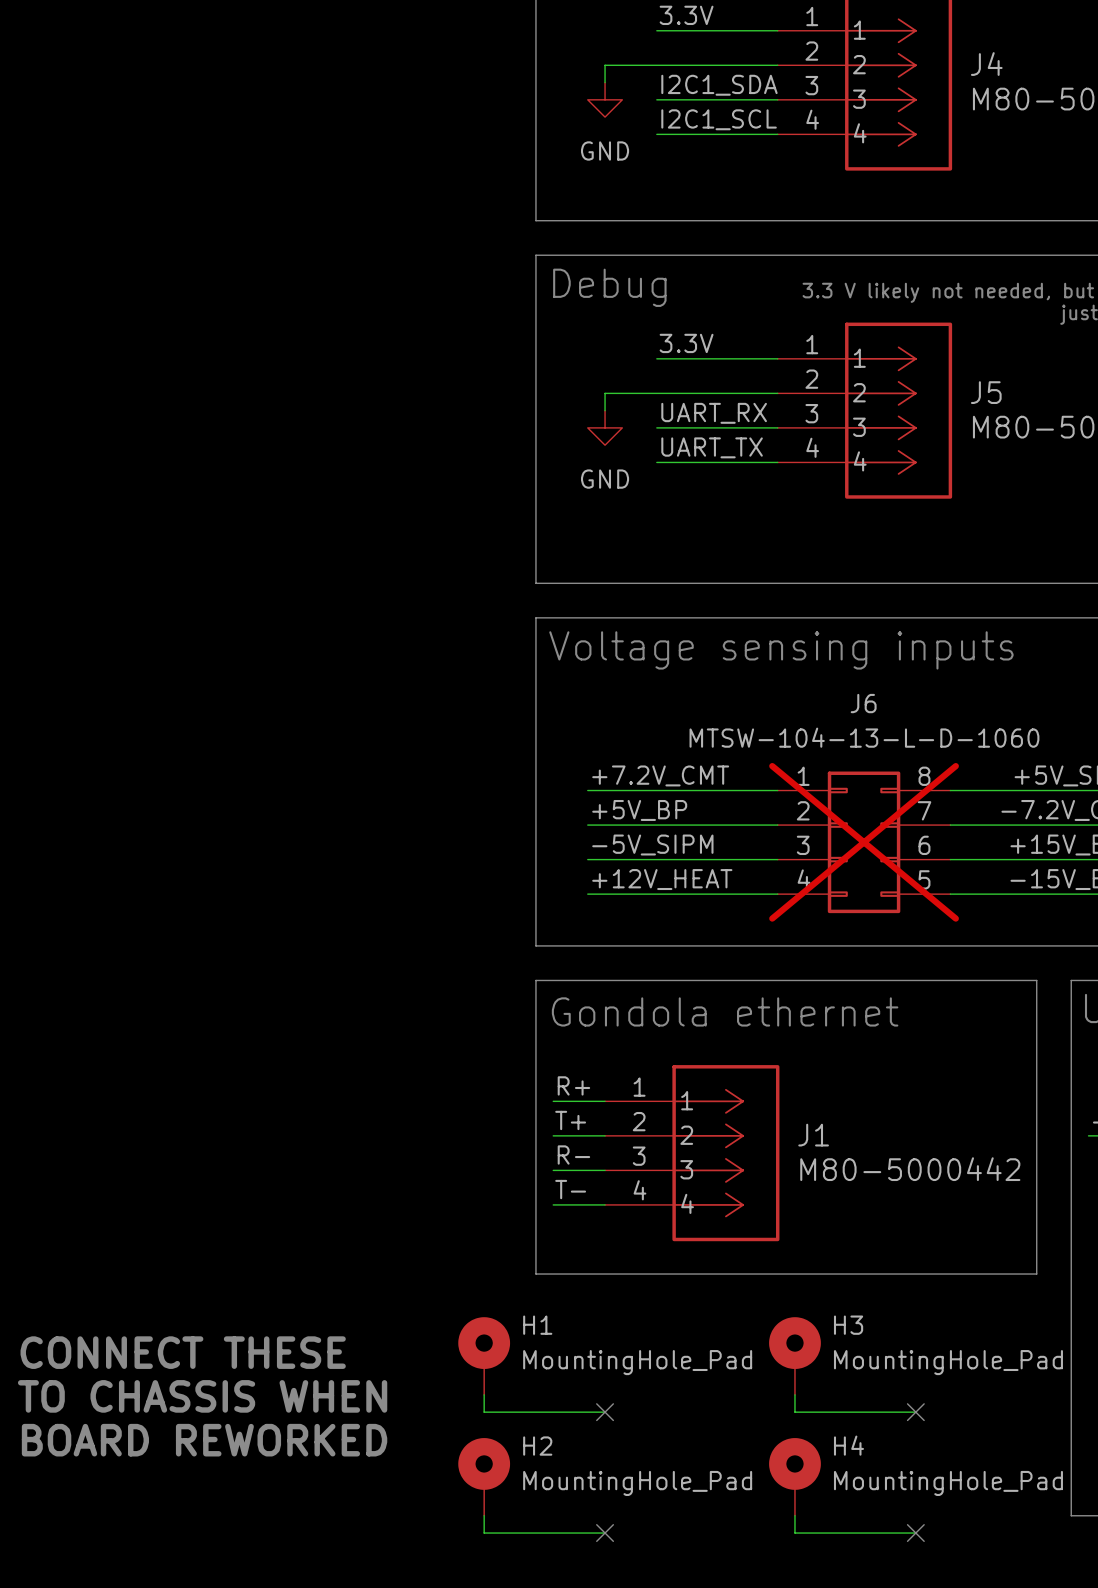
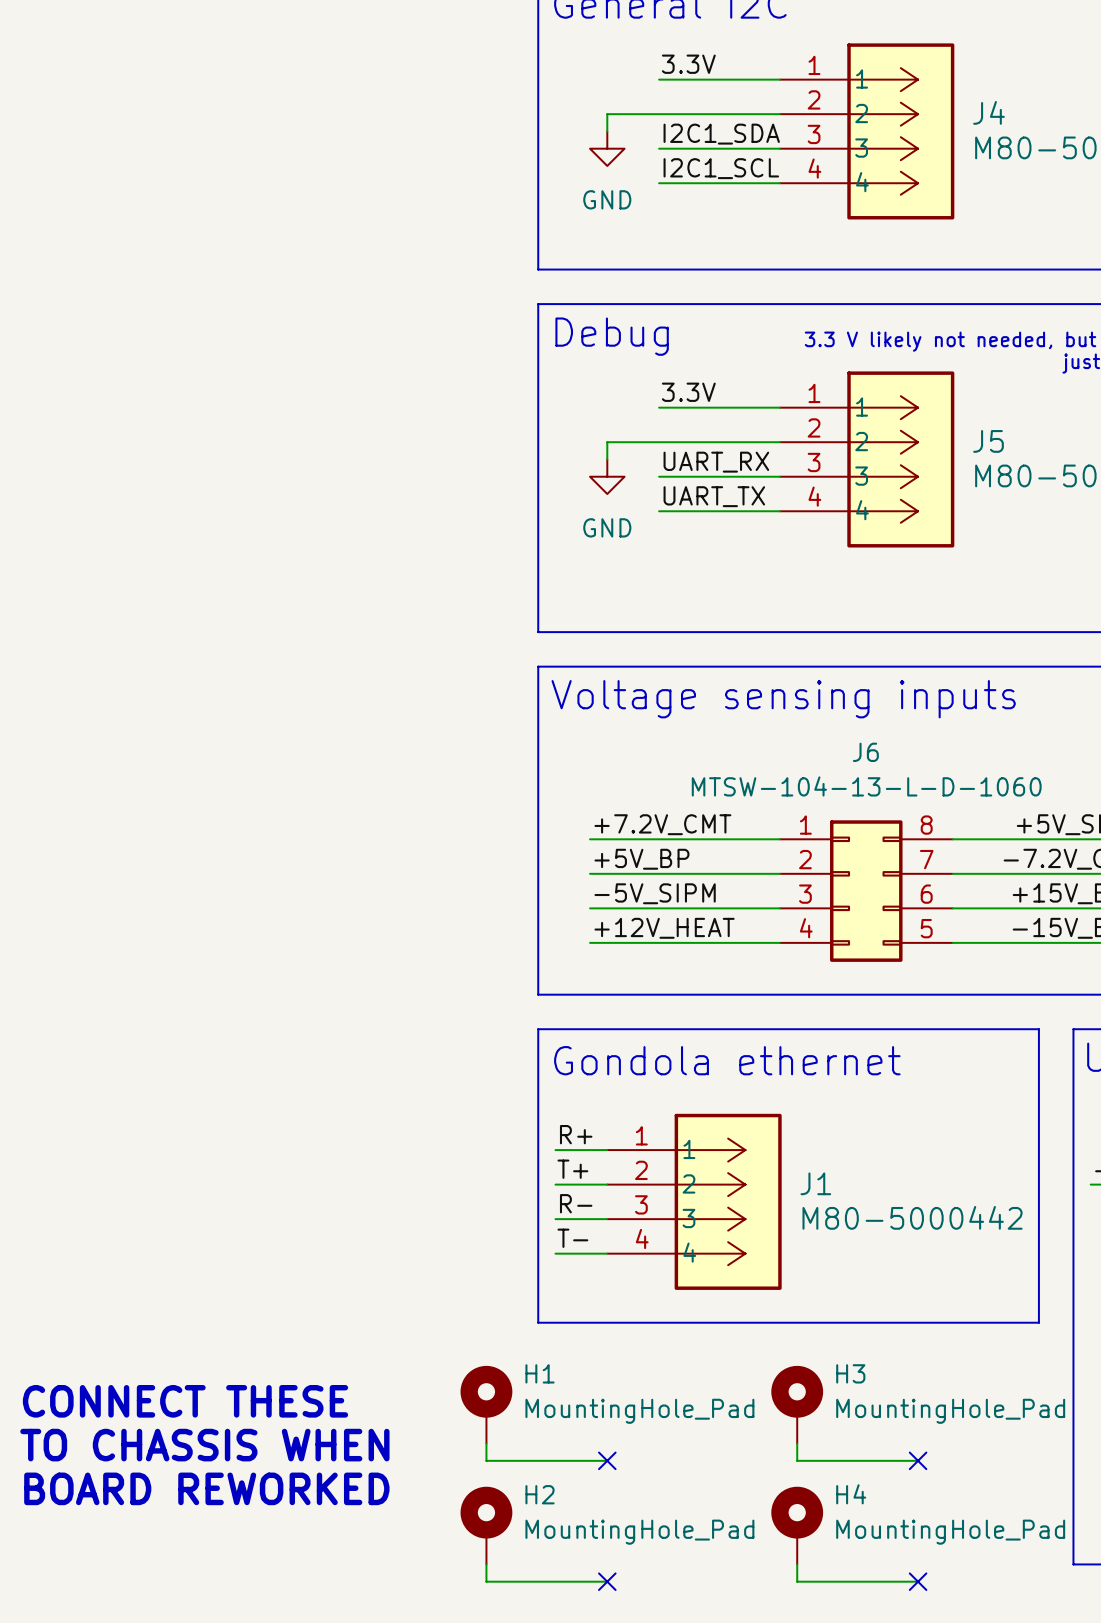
J6 do-not-place cross: (864, 842) -> none

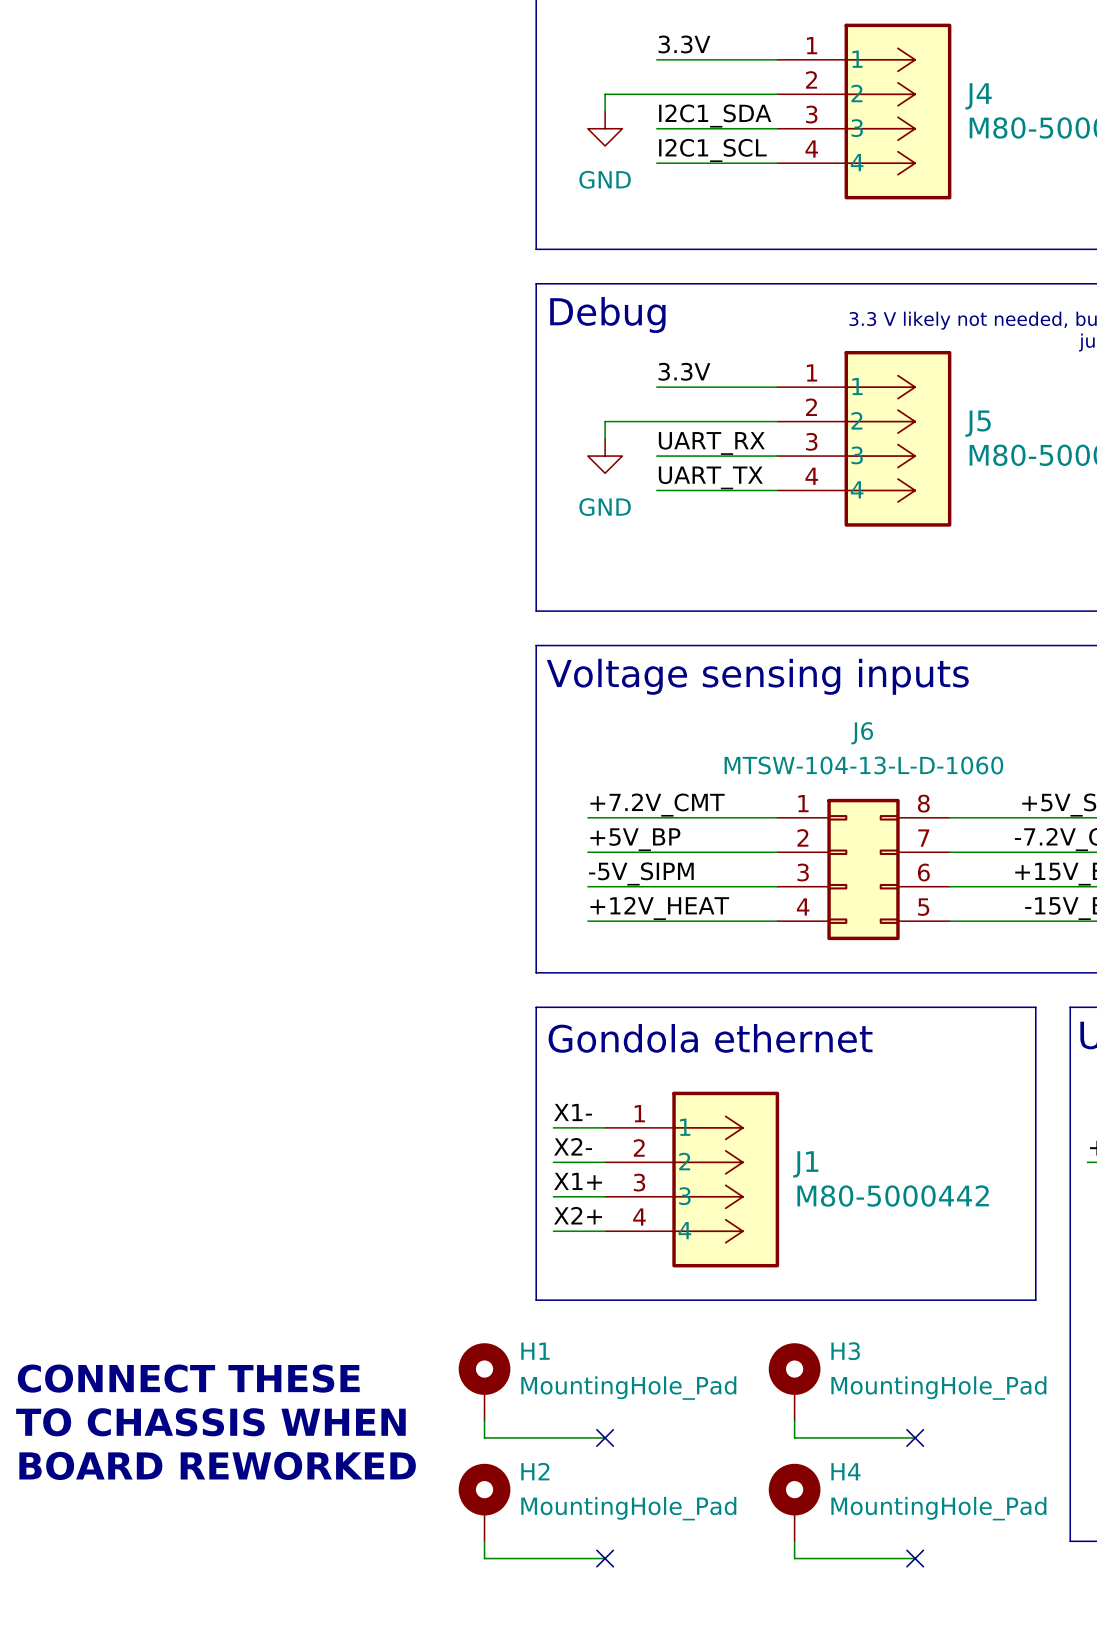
label: R+ (576, 1134) -> X1- (573, 1112)
label: T+ (572, 1169) -> X2- (573, 1146)
label: R- (576, 1203) -> X1+ (578, 1181)
label: T- (572, 1238) -> X2+ (578, 1215)

